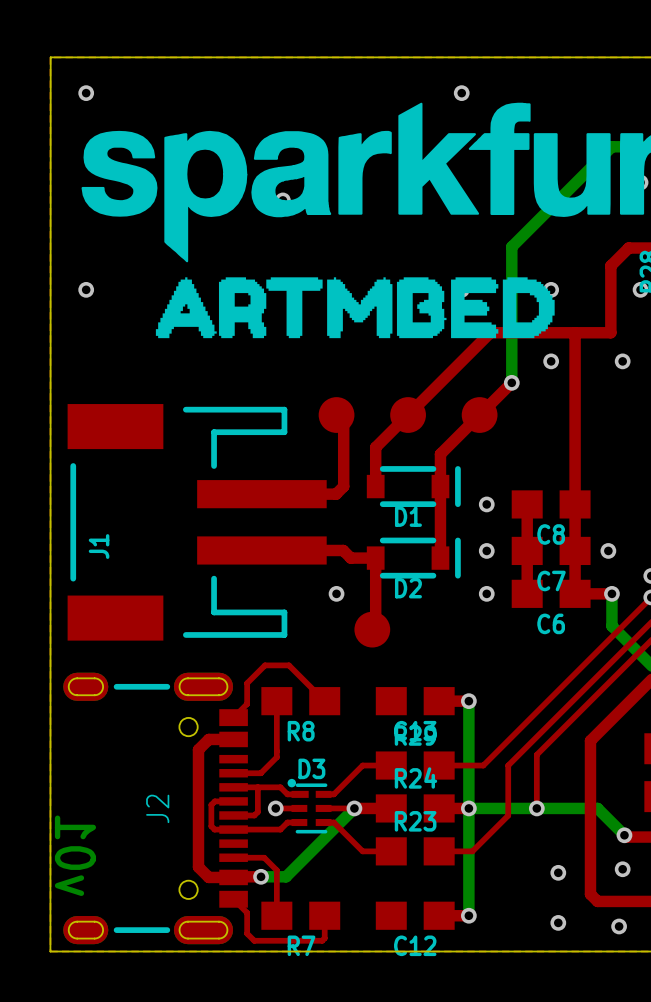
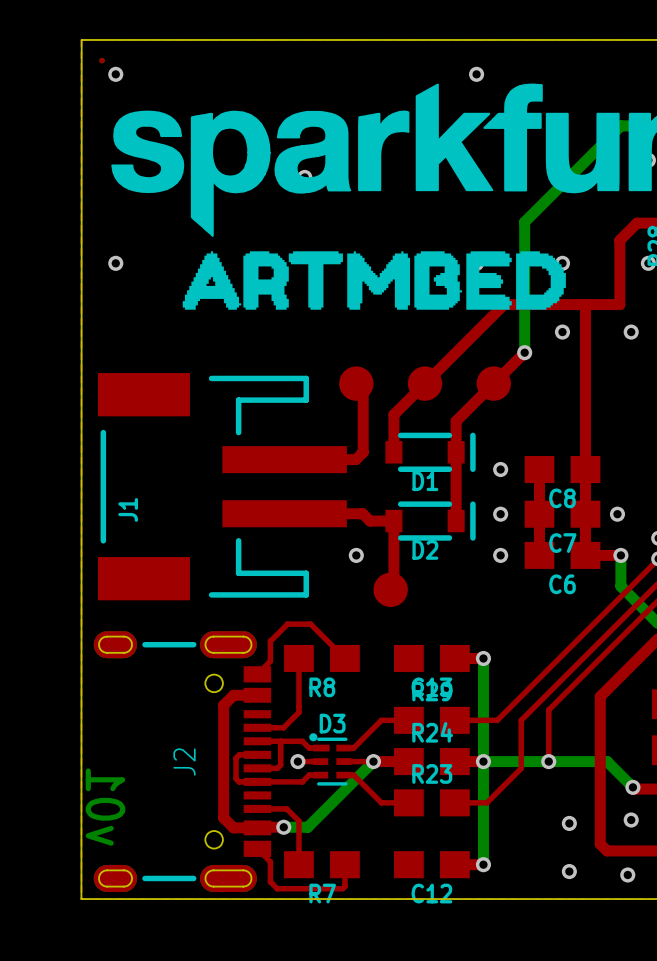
part: none -> (102, 60)

